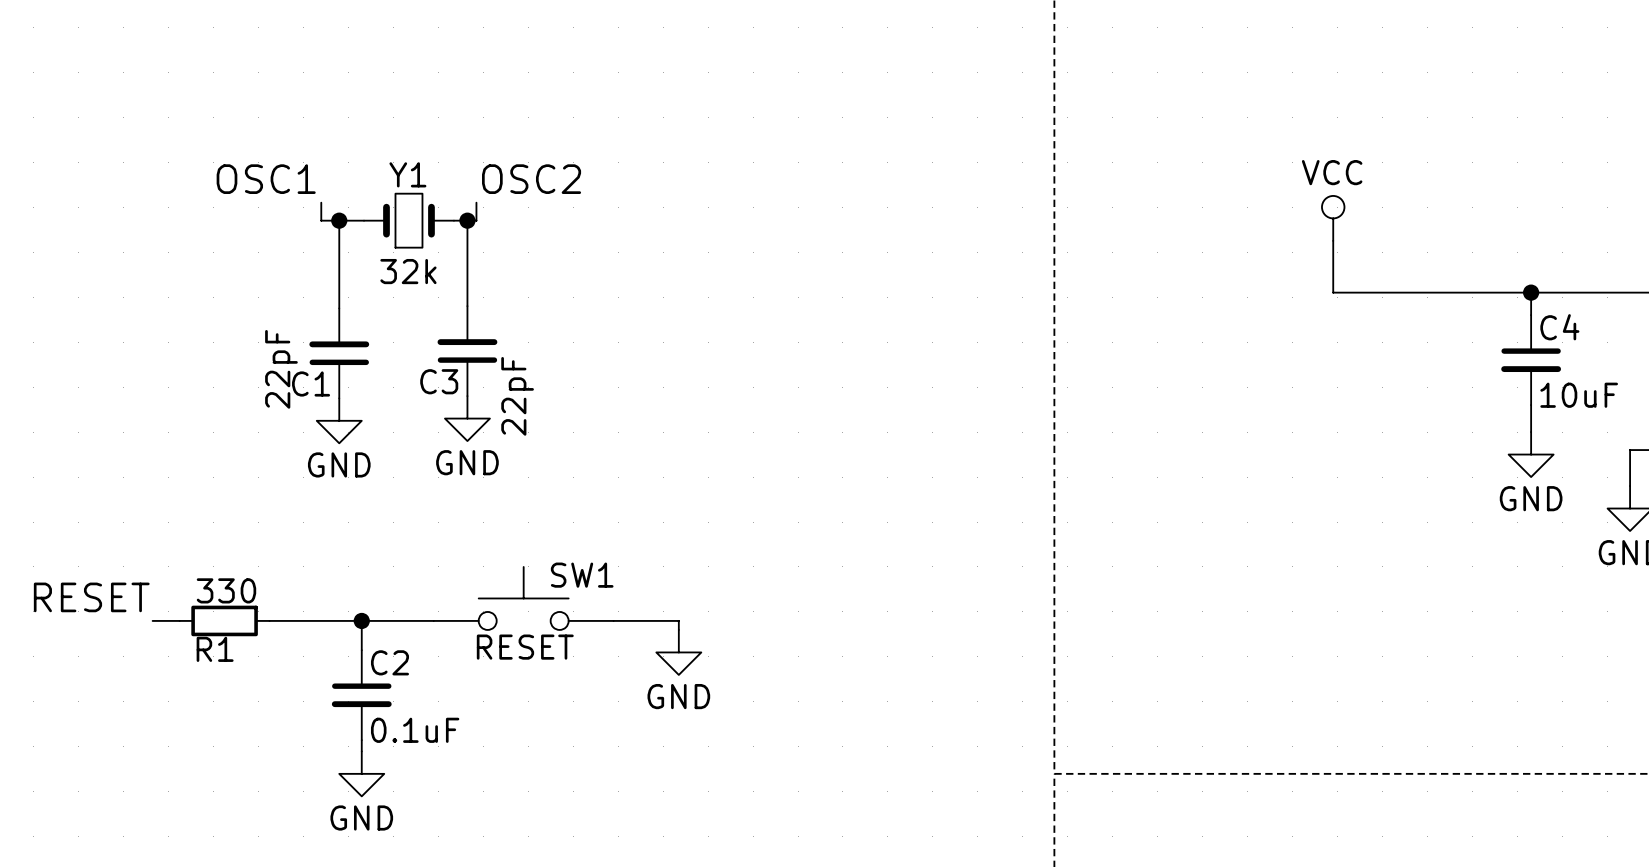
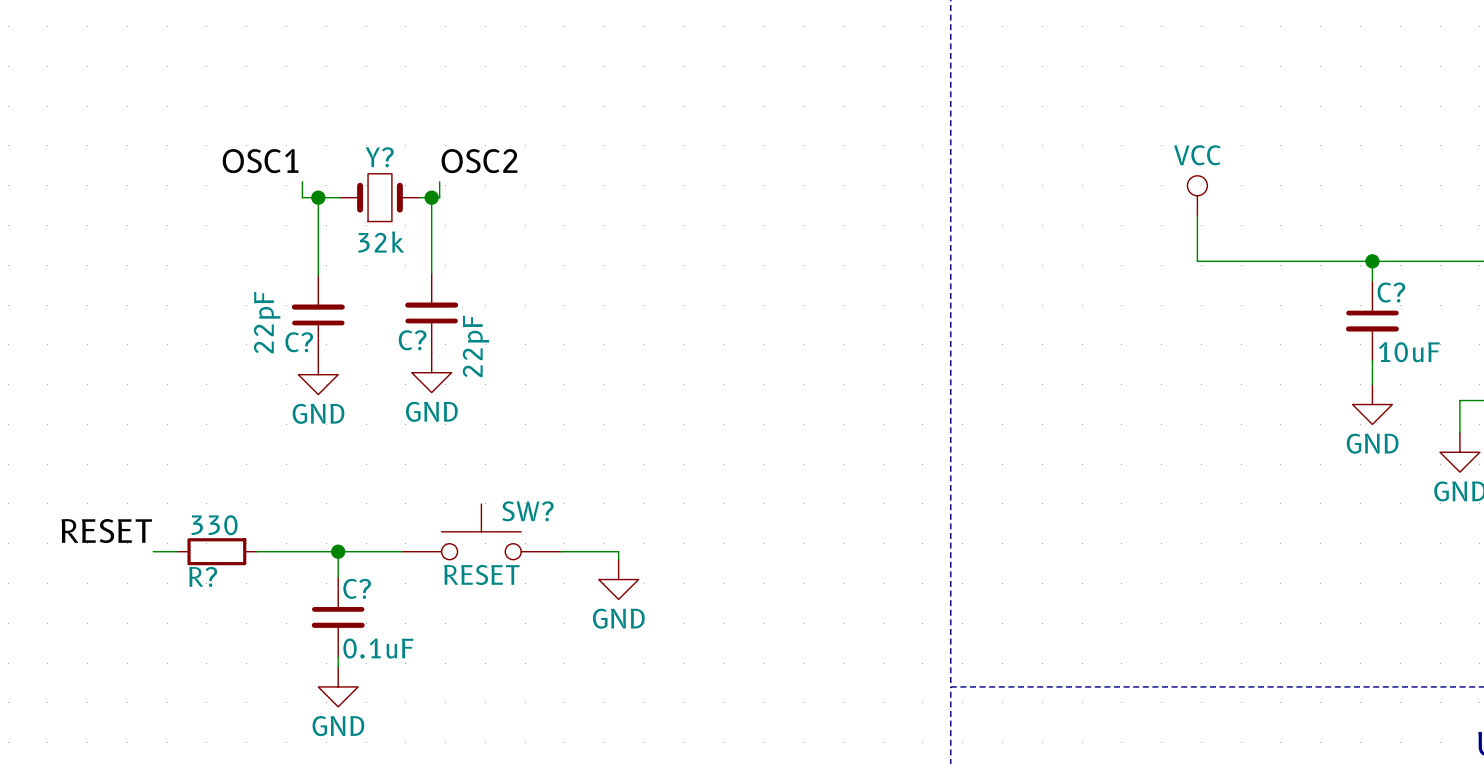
Y1 name: Y1 (407, 174) -> Y? (379, 157)
C4 name: C4 (1559, 327) -> C? (1391, 292)
C3 name: C3 (439, 381) -> C? (412, 340)
C1 name: C1 (311, 383) -> C? (299, 342)
SW1 name: SW1 (582, 575) -> SW? (528, 511)
R1 name: R1 (215, 649) -> R? (203, 576)
C2 name: C2 (389, 662) -> C? (357, 588)

